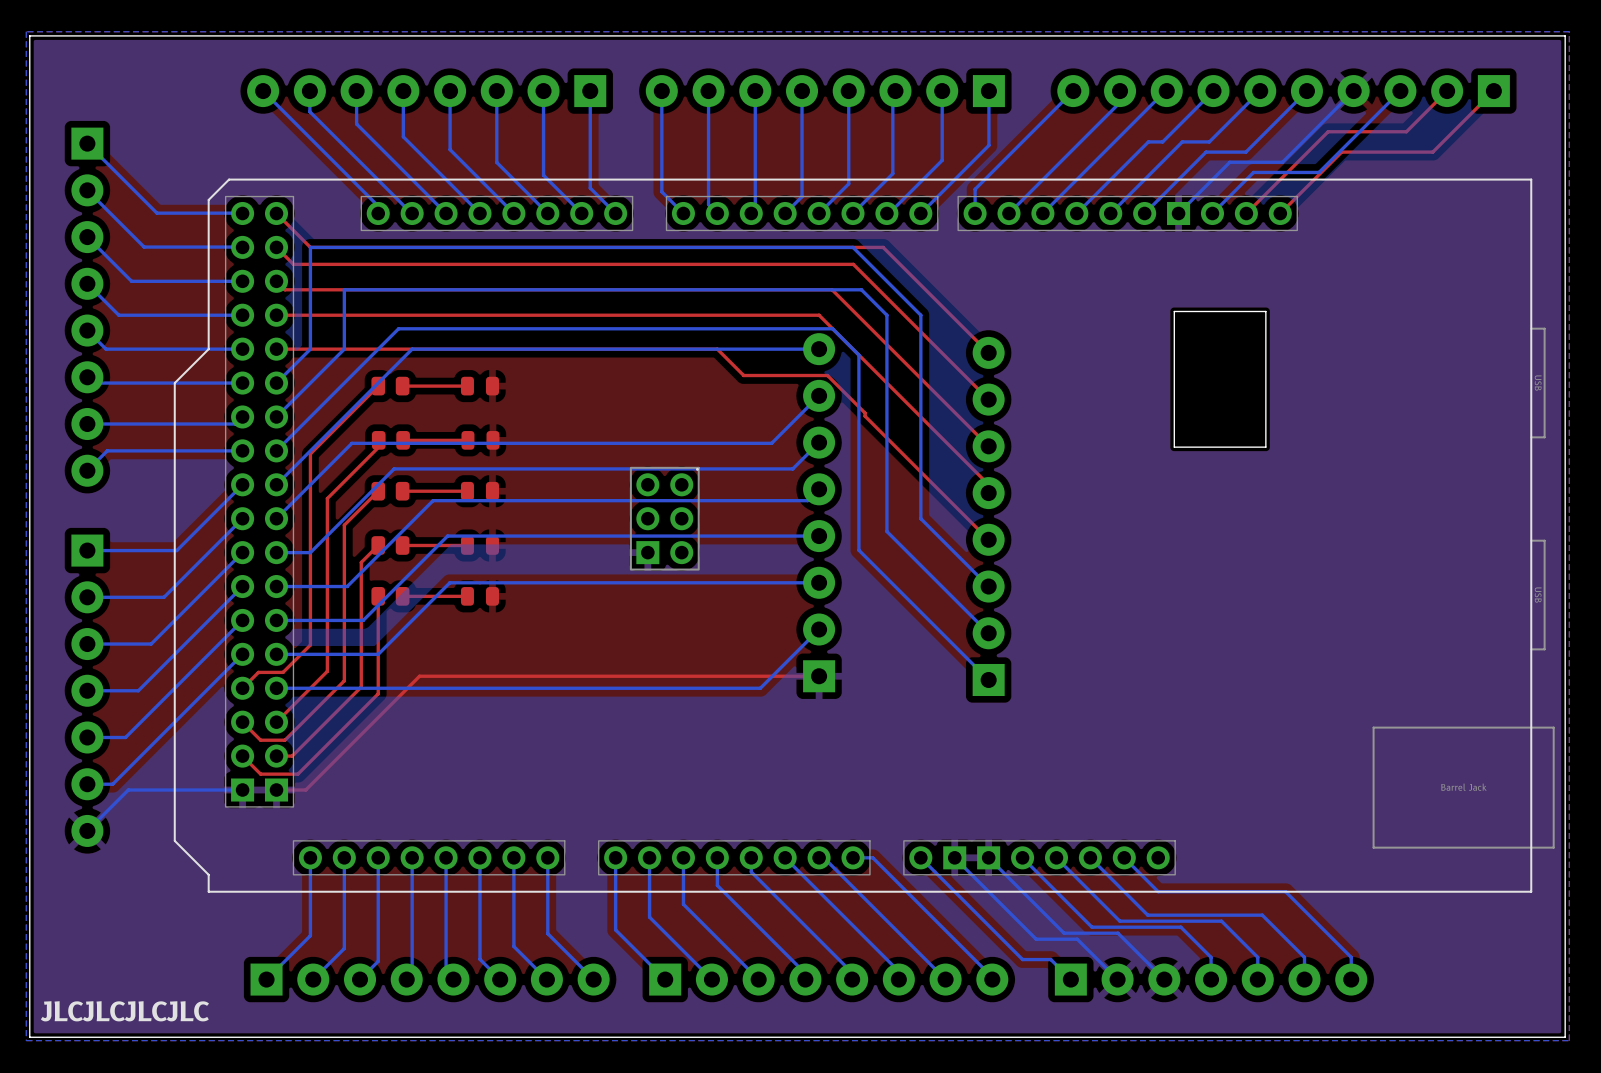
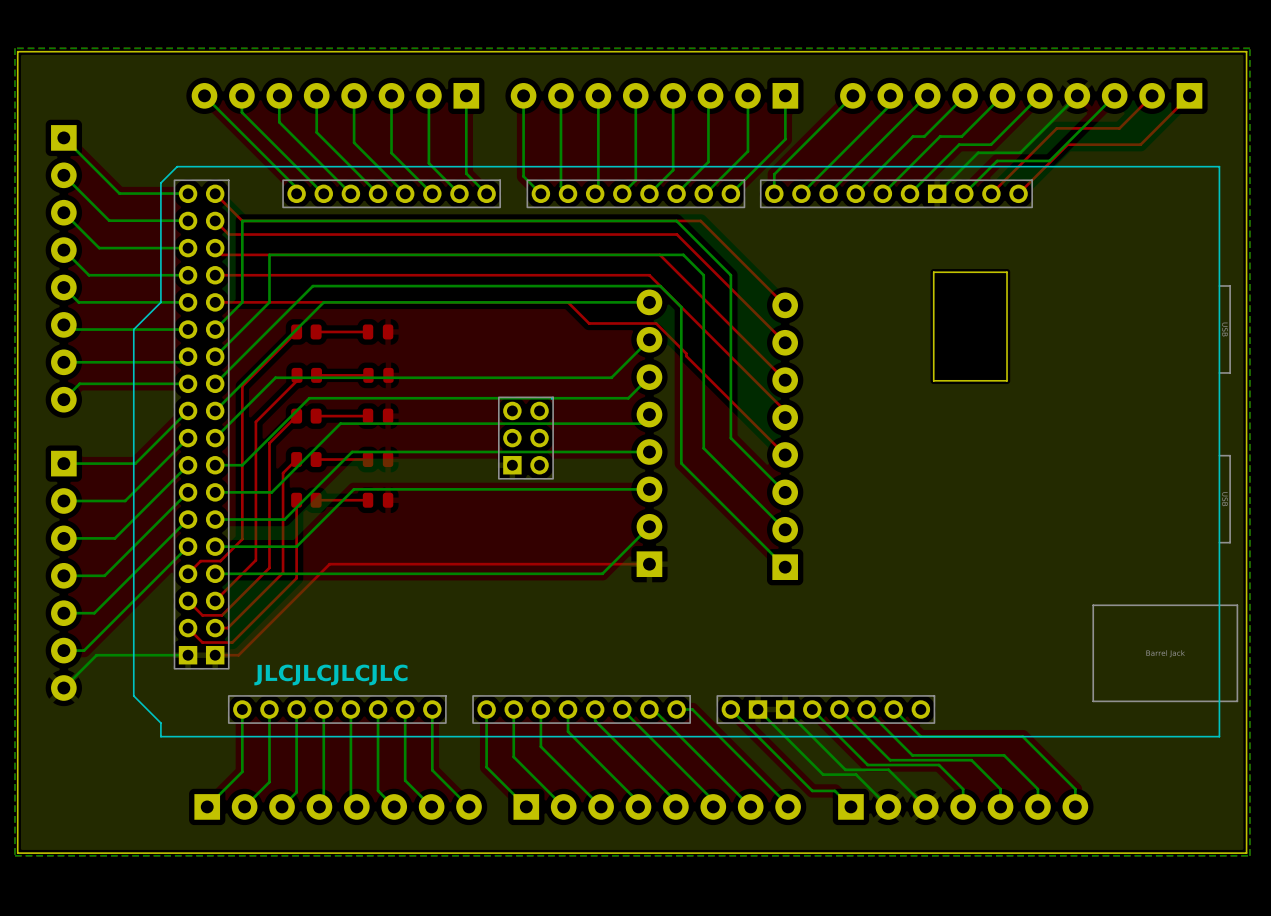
text: none -> JLCJLCJLCJLC (330, 674)
text: JLCJLCJLCJLC (124, 1011) -> none

